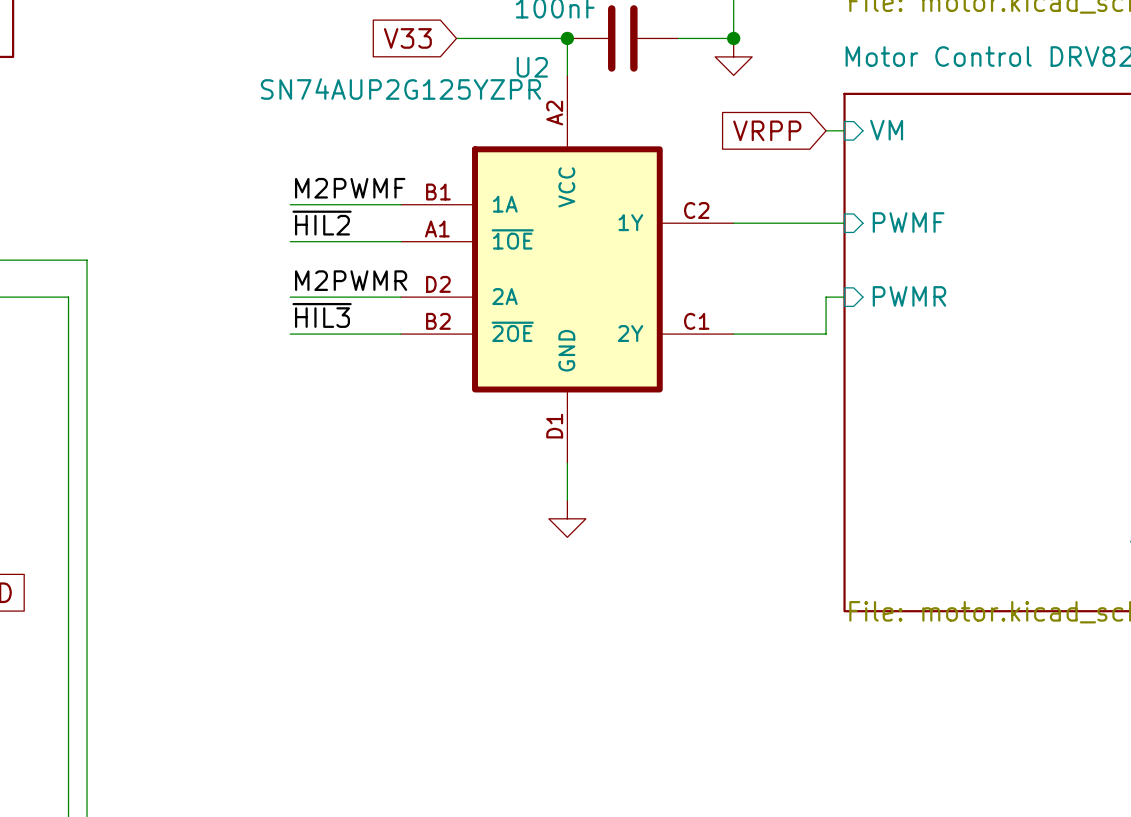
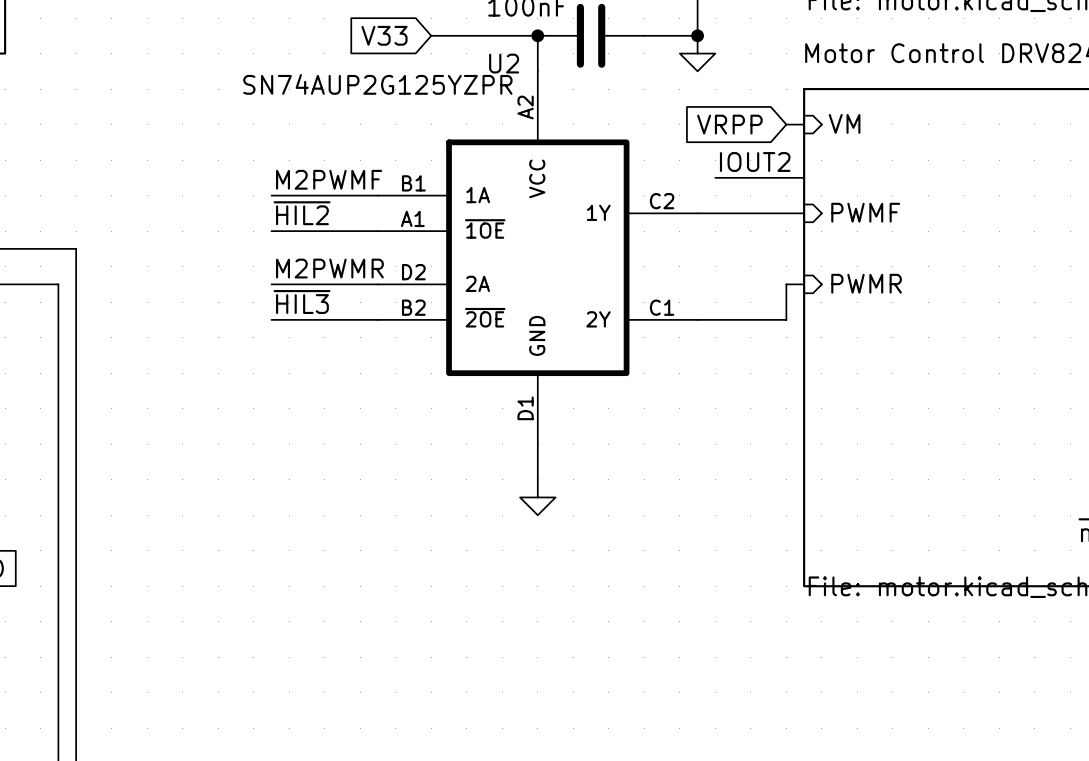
label: none -> IOUT2 (755, 162)
wire: none -> (715, 177) (804, 177)

